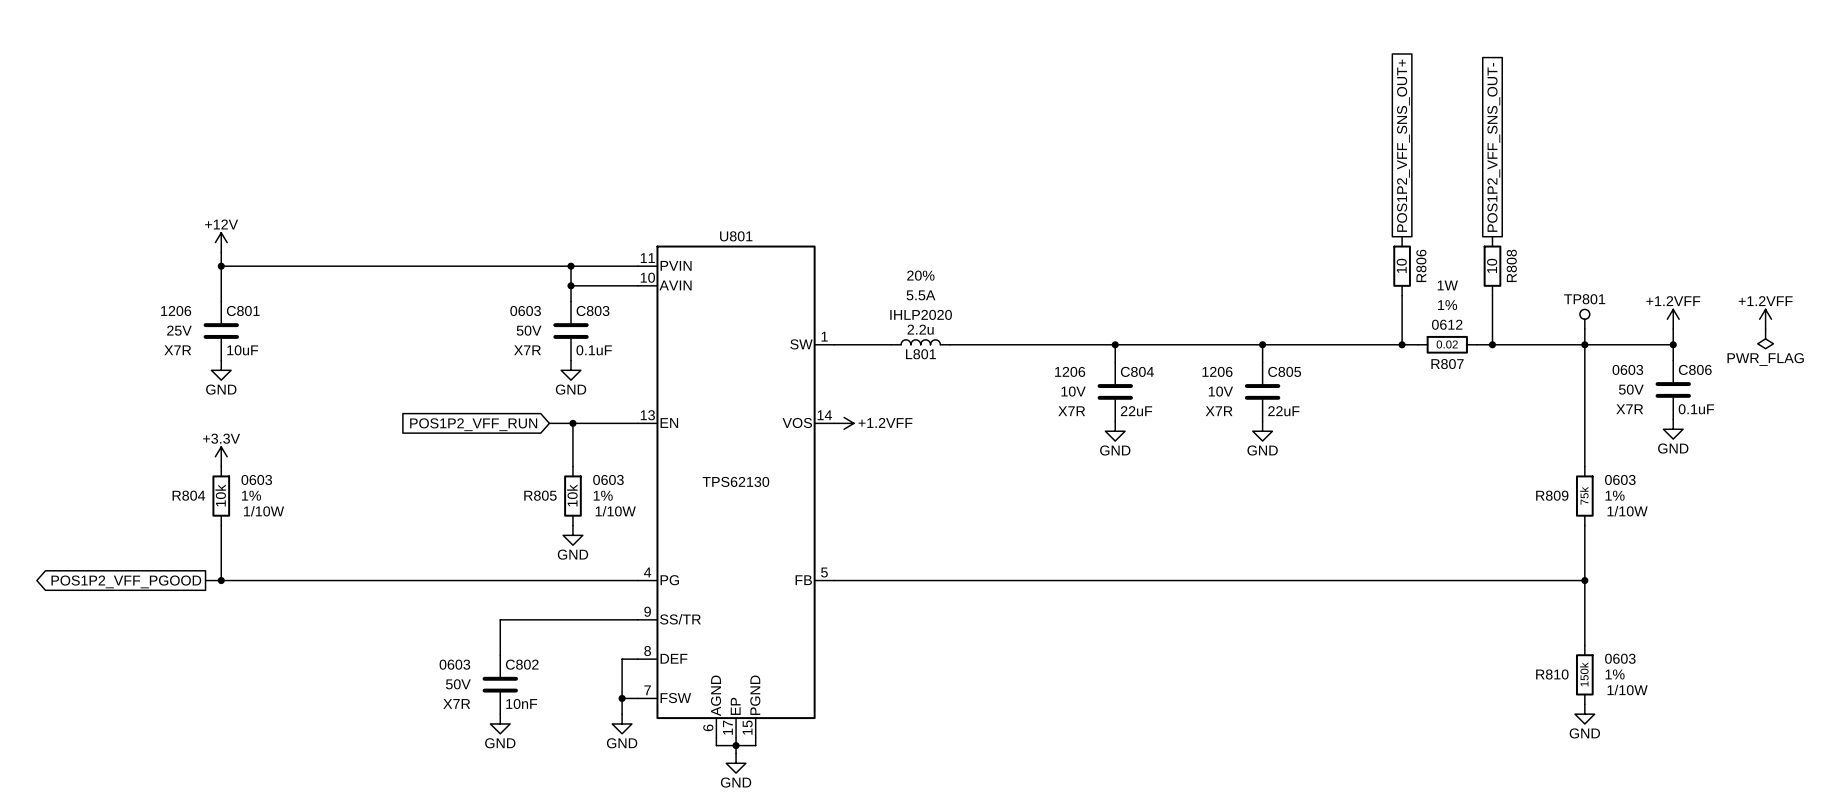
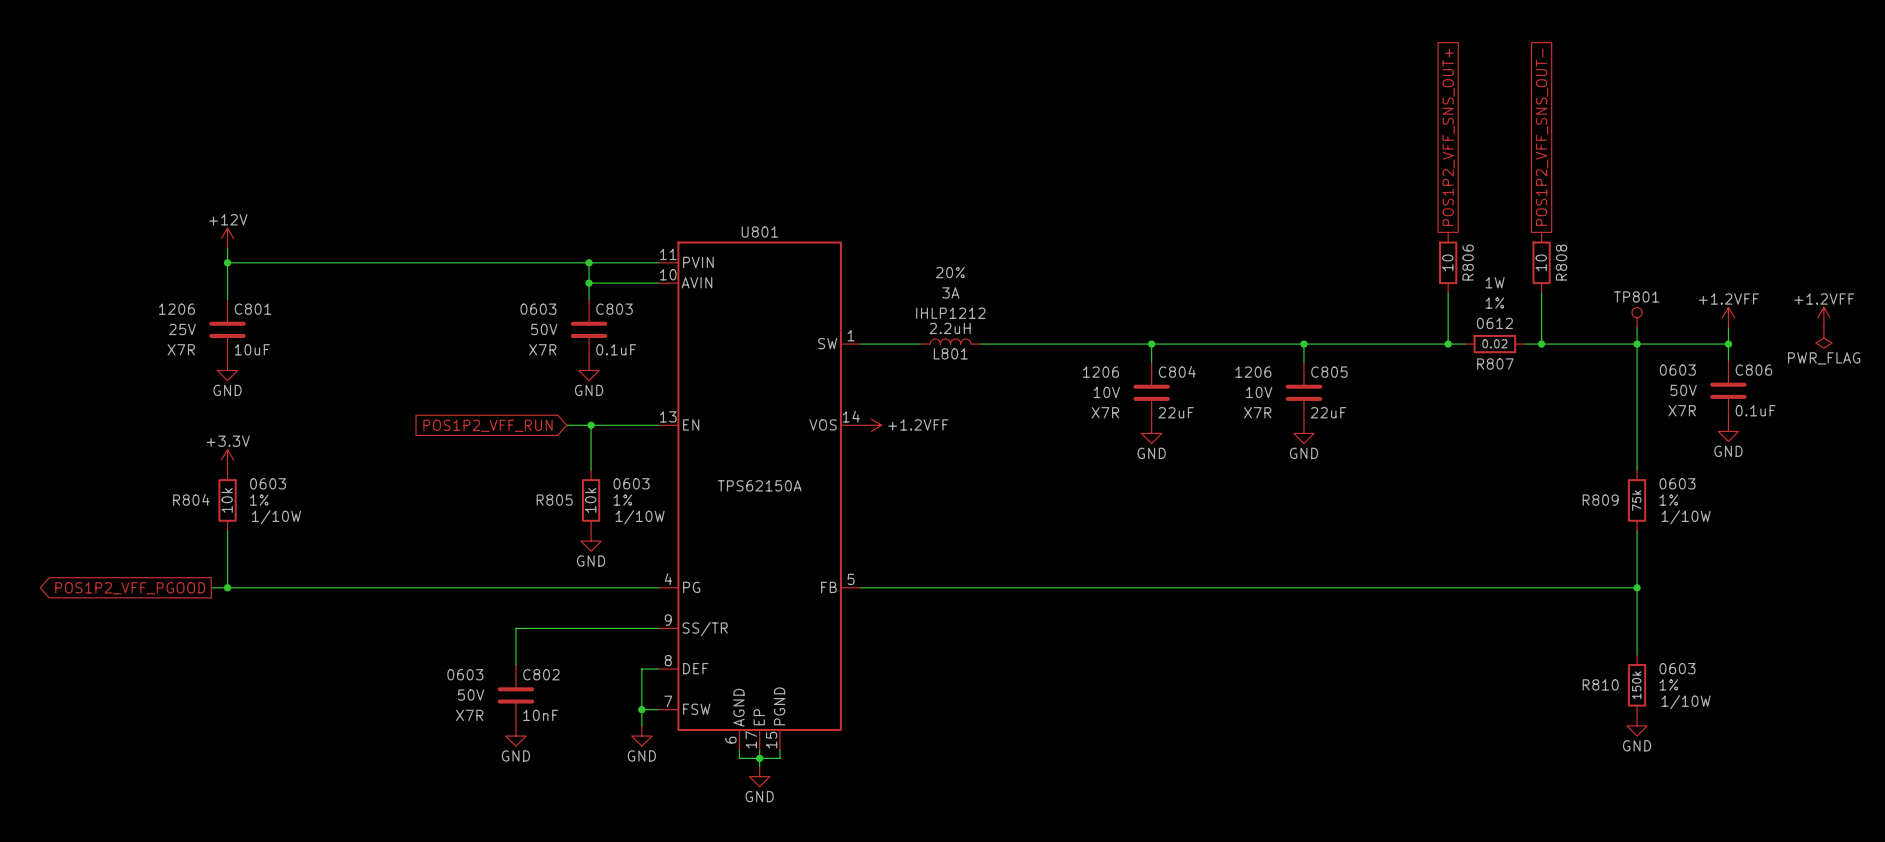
L801 text: 5.5A (921, 295) -> 3A (950, 292)
L801 text: IHLP2020 (921, 314) -> IHLP1212 (950, 313)
L801 value: 2.2u (920, 329) -> 2.2uH (950, 328)
U801 value: TPS62130 (735, 481) -> TPS62150A (759, 485)

